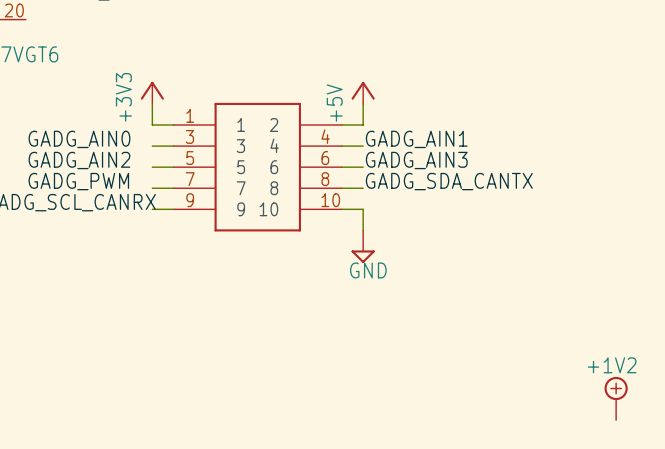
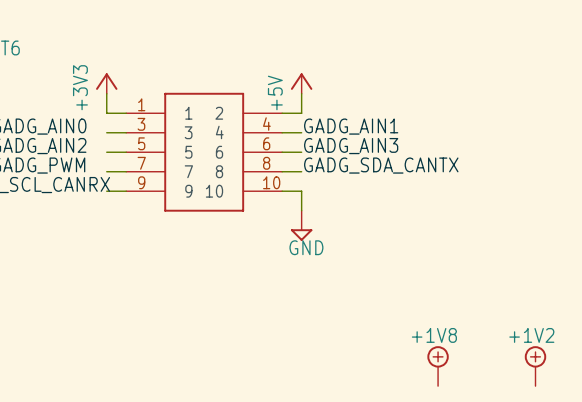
power symbol: none -> +1V8 (438, 366)

